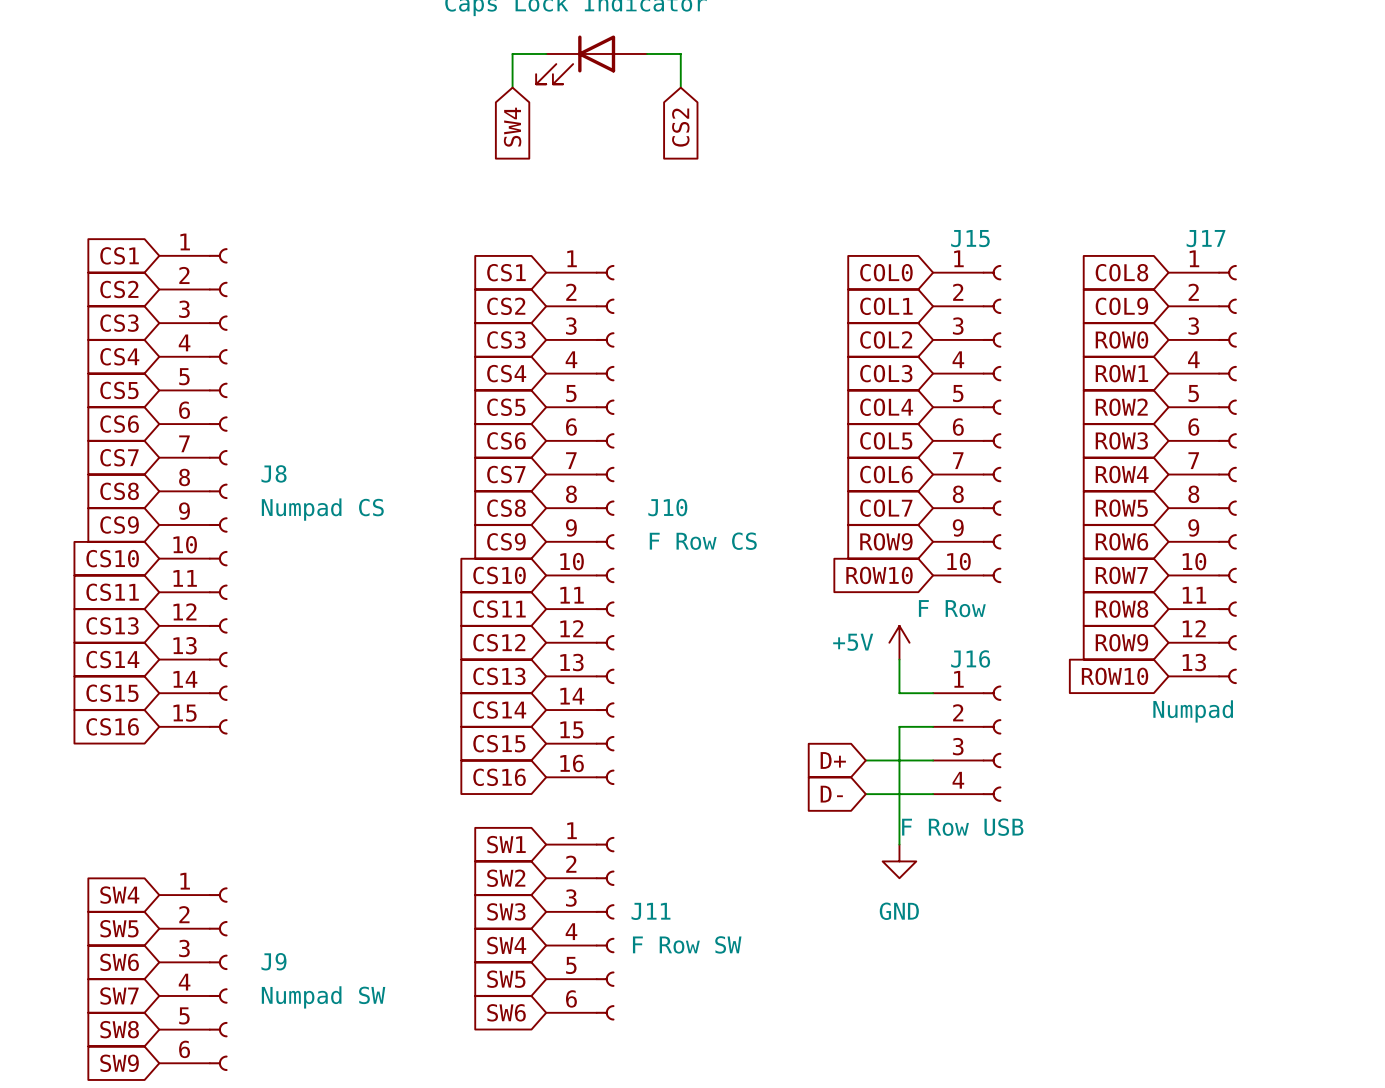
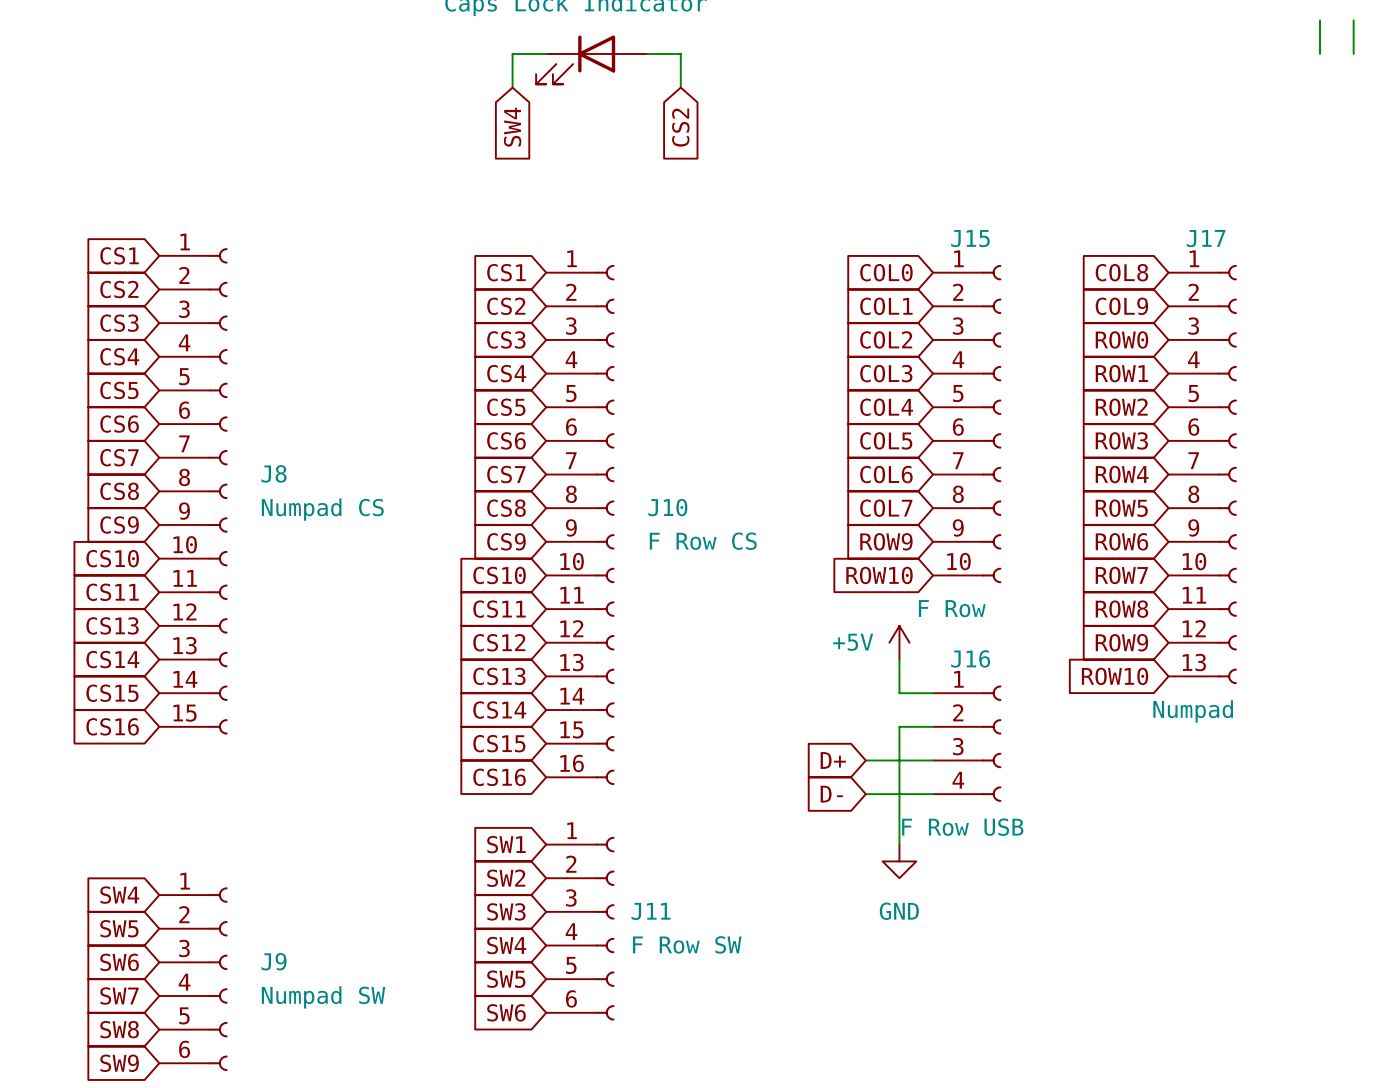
wire: none -> (1319, 20) (1319, 53)
wire: none -> (1353, 20) (1353, 53)

